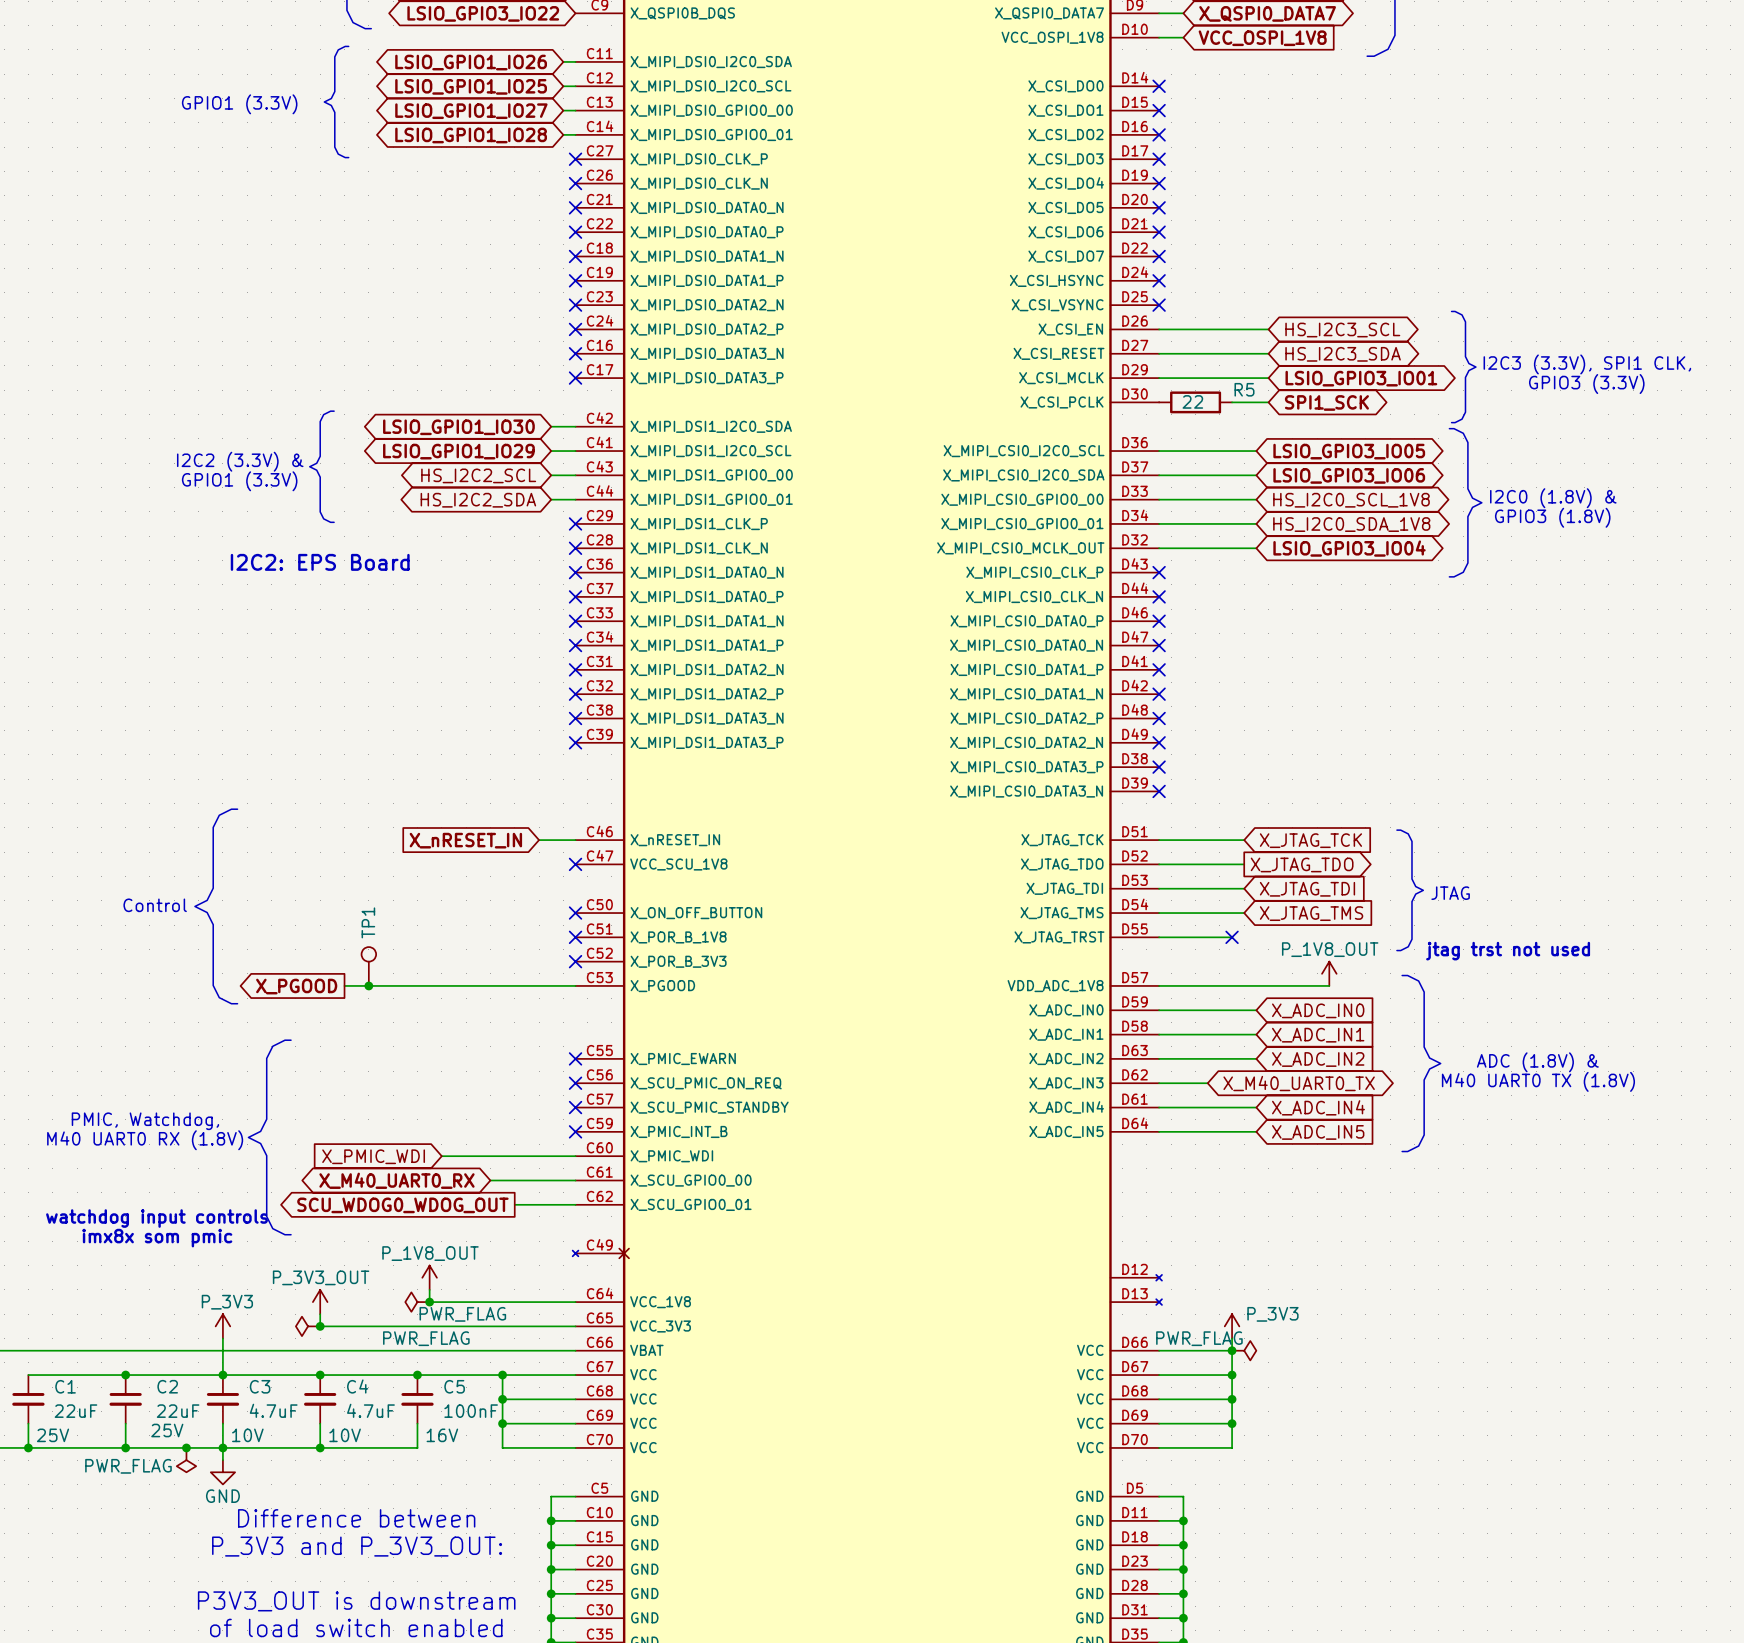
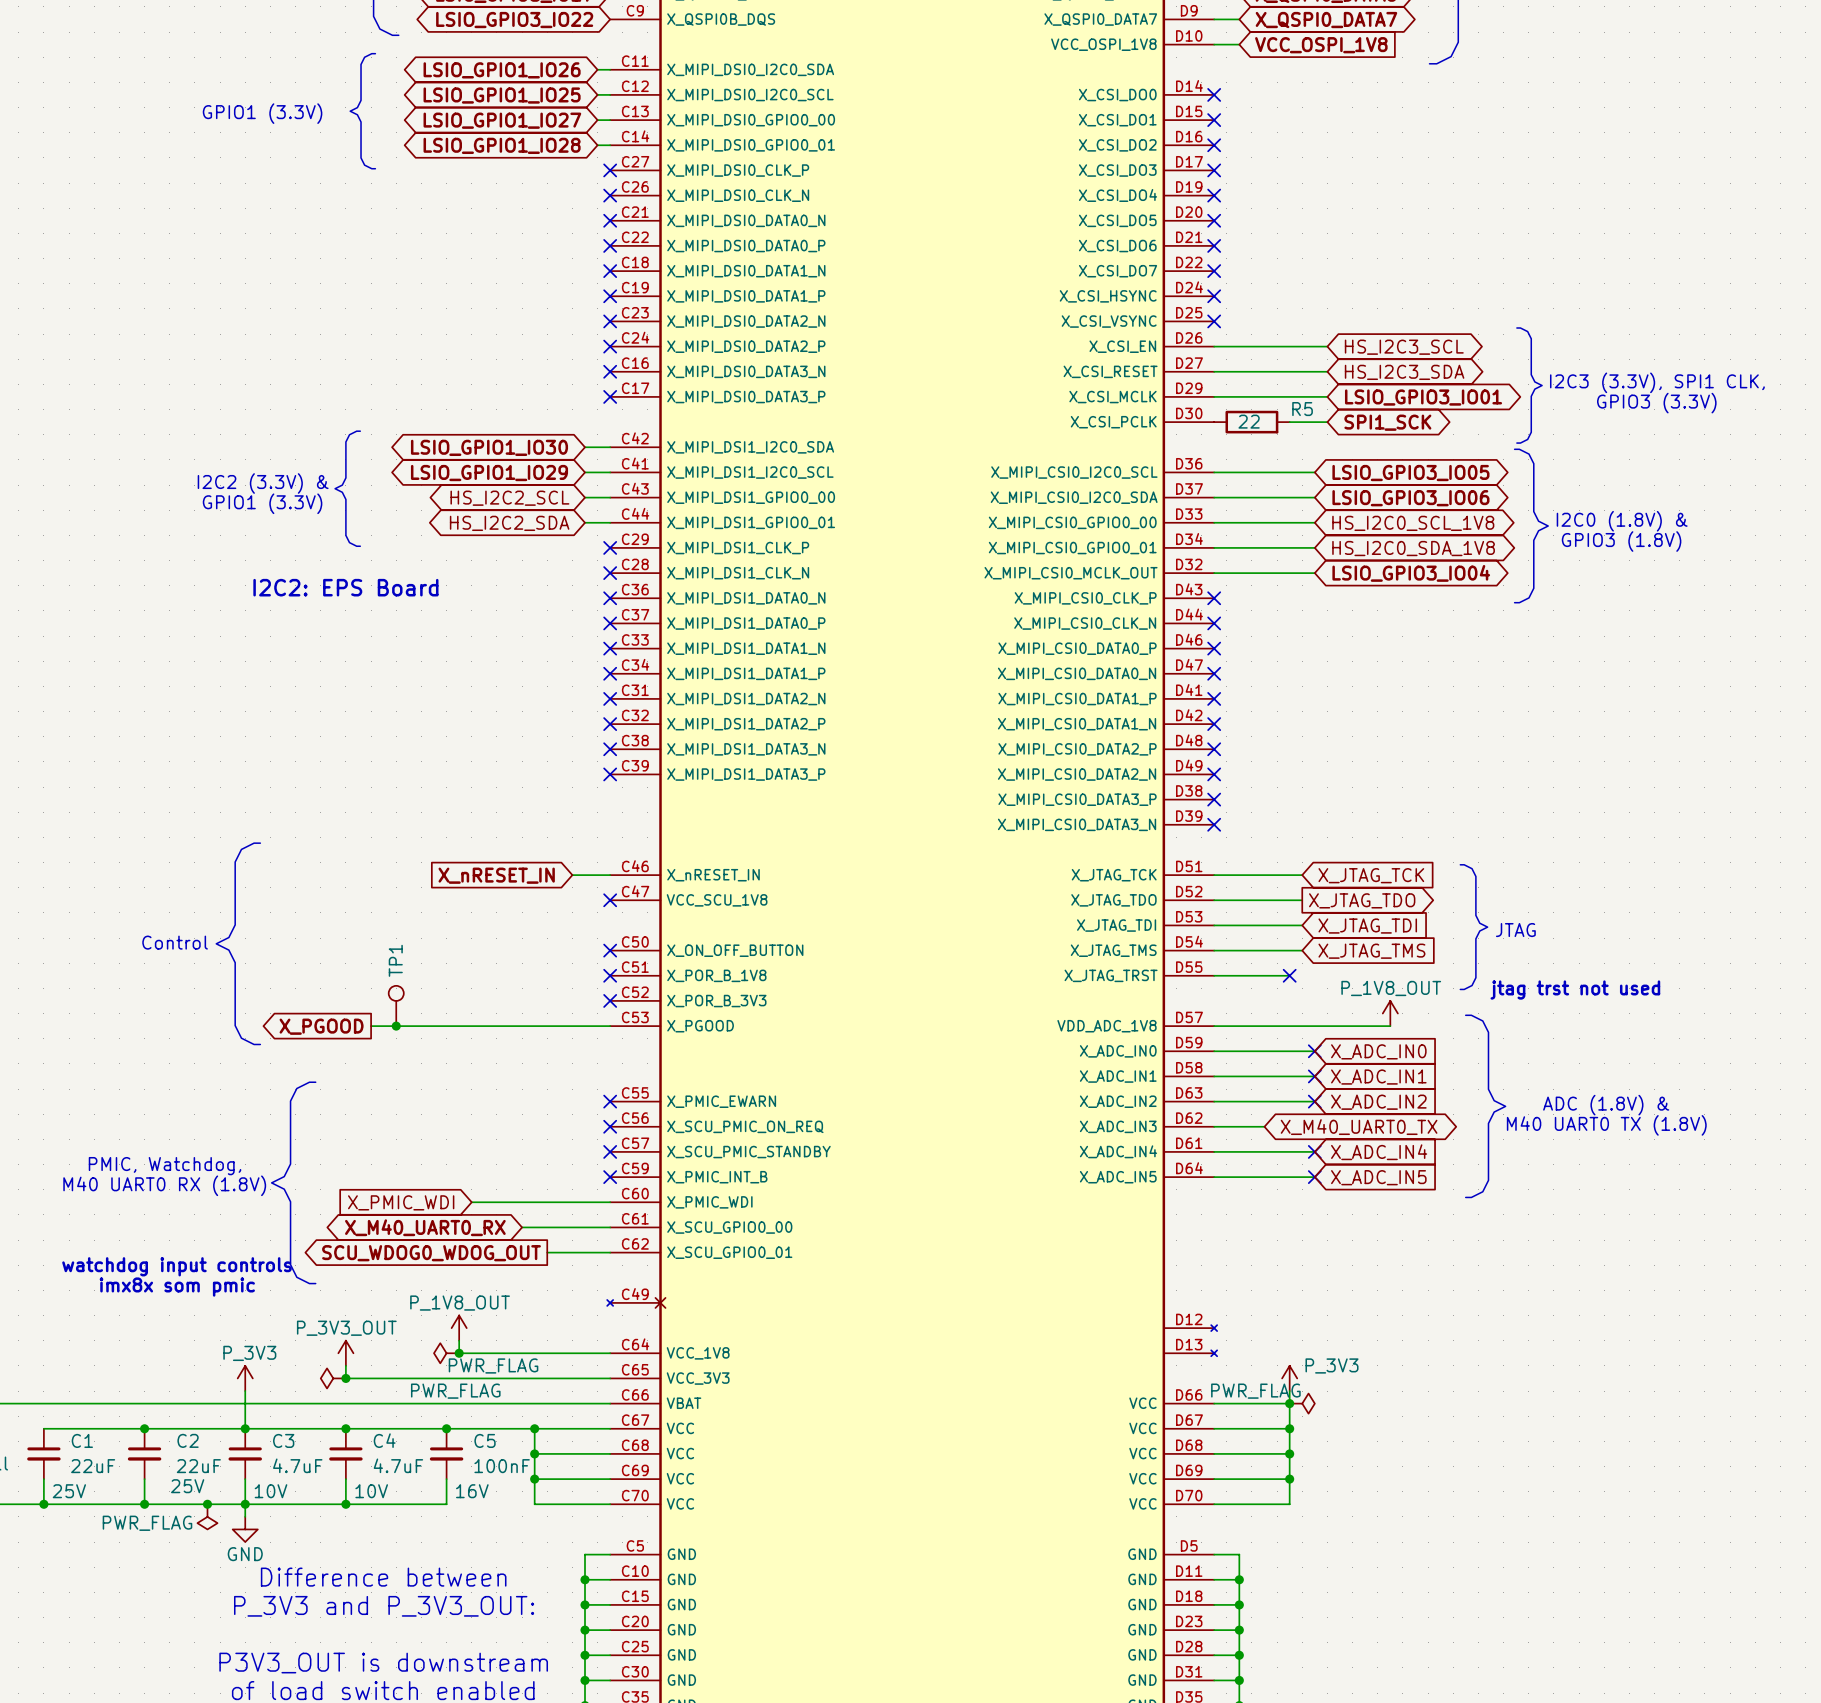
no-connect mark: none -> (1314, 1051)
no-connect mark: none -> (1314, 1076)
no-connect mark: none -> (1314, 1101)
no-connect mark: none -> (1314, 1151)
no-connect mark: none -> (1314, 1177)

